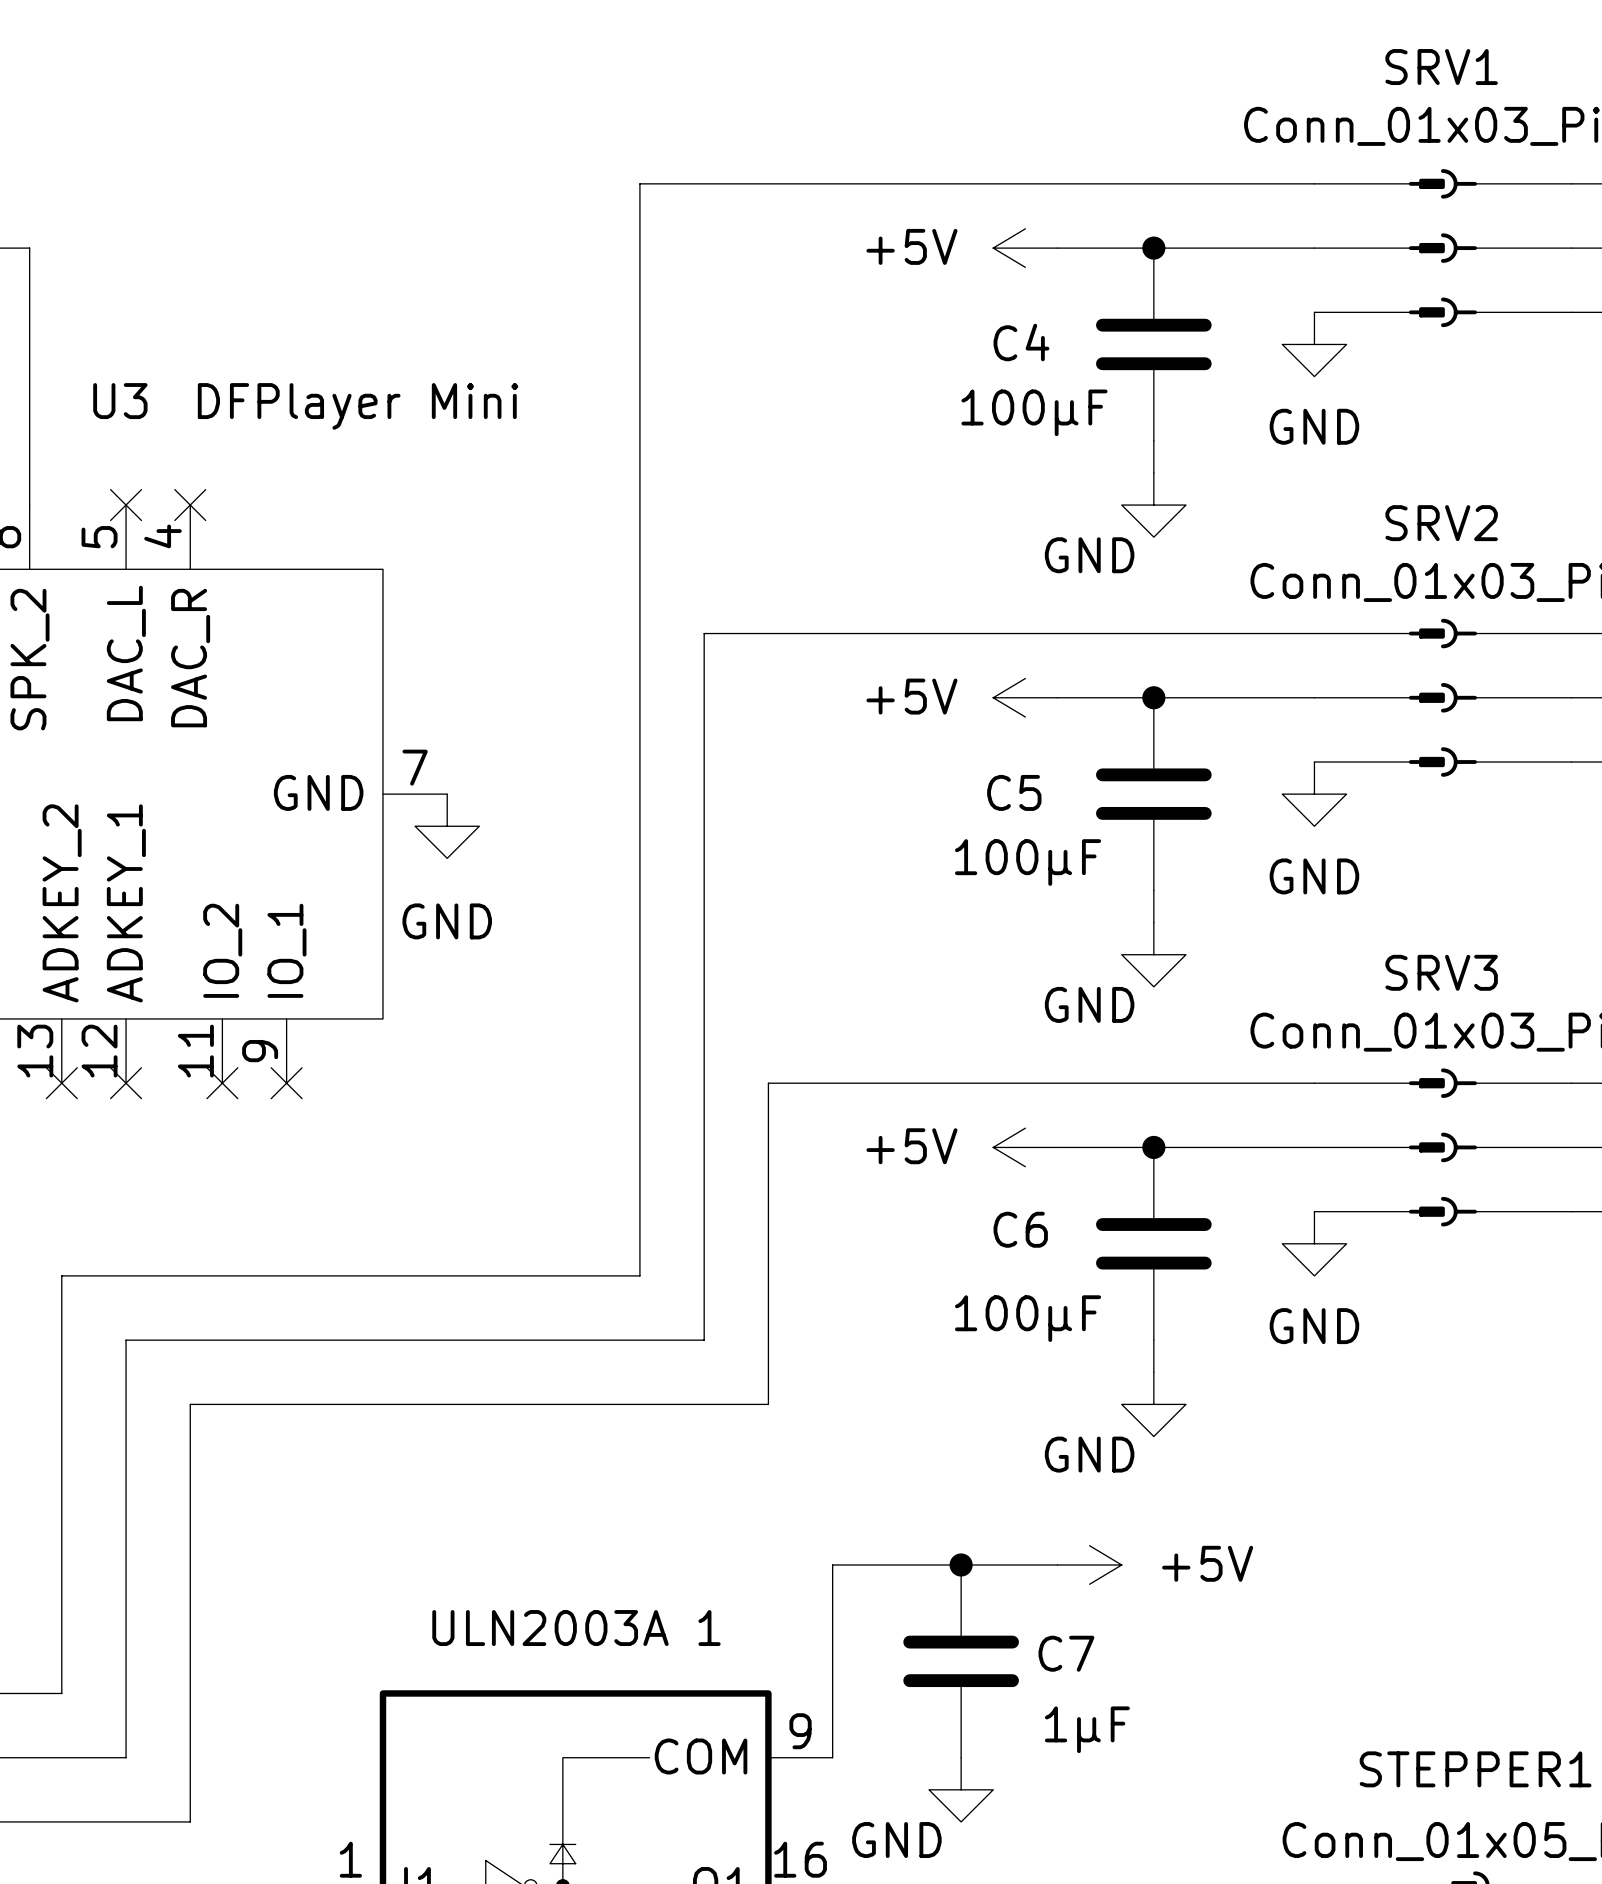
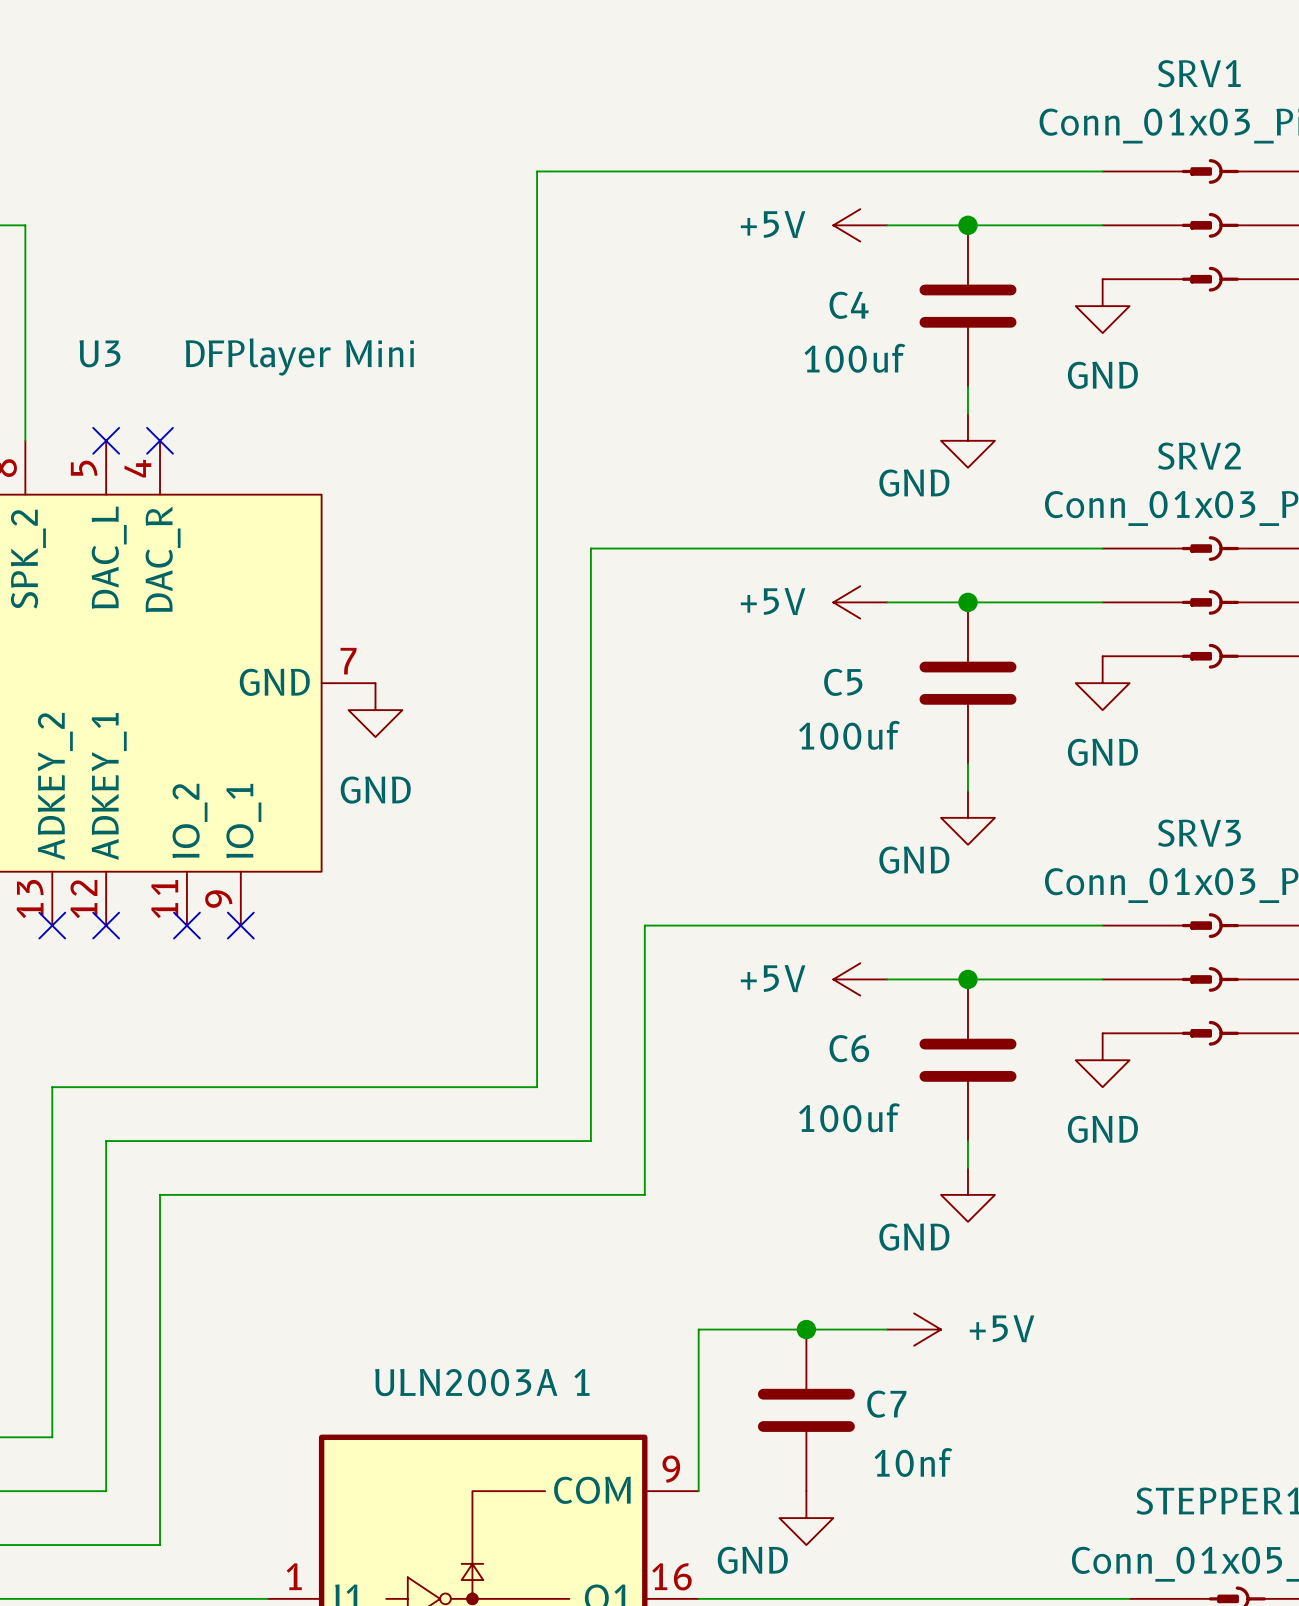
C4 value: 100µF (1034, 412) -> 100uf (854, 358)
C5 value: 100µF (1028, 862) -> 100uf (849, 735)
C6 value: 100µF (1028, 1318) -> 100uf (849, 1117)
C7 value: 1µF (1087, 1729) -> 10nf (913, 1462)

